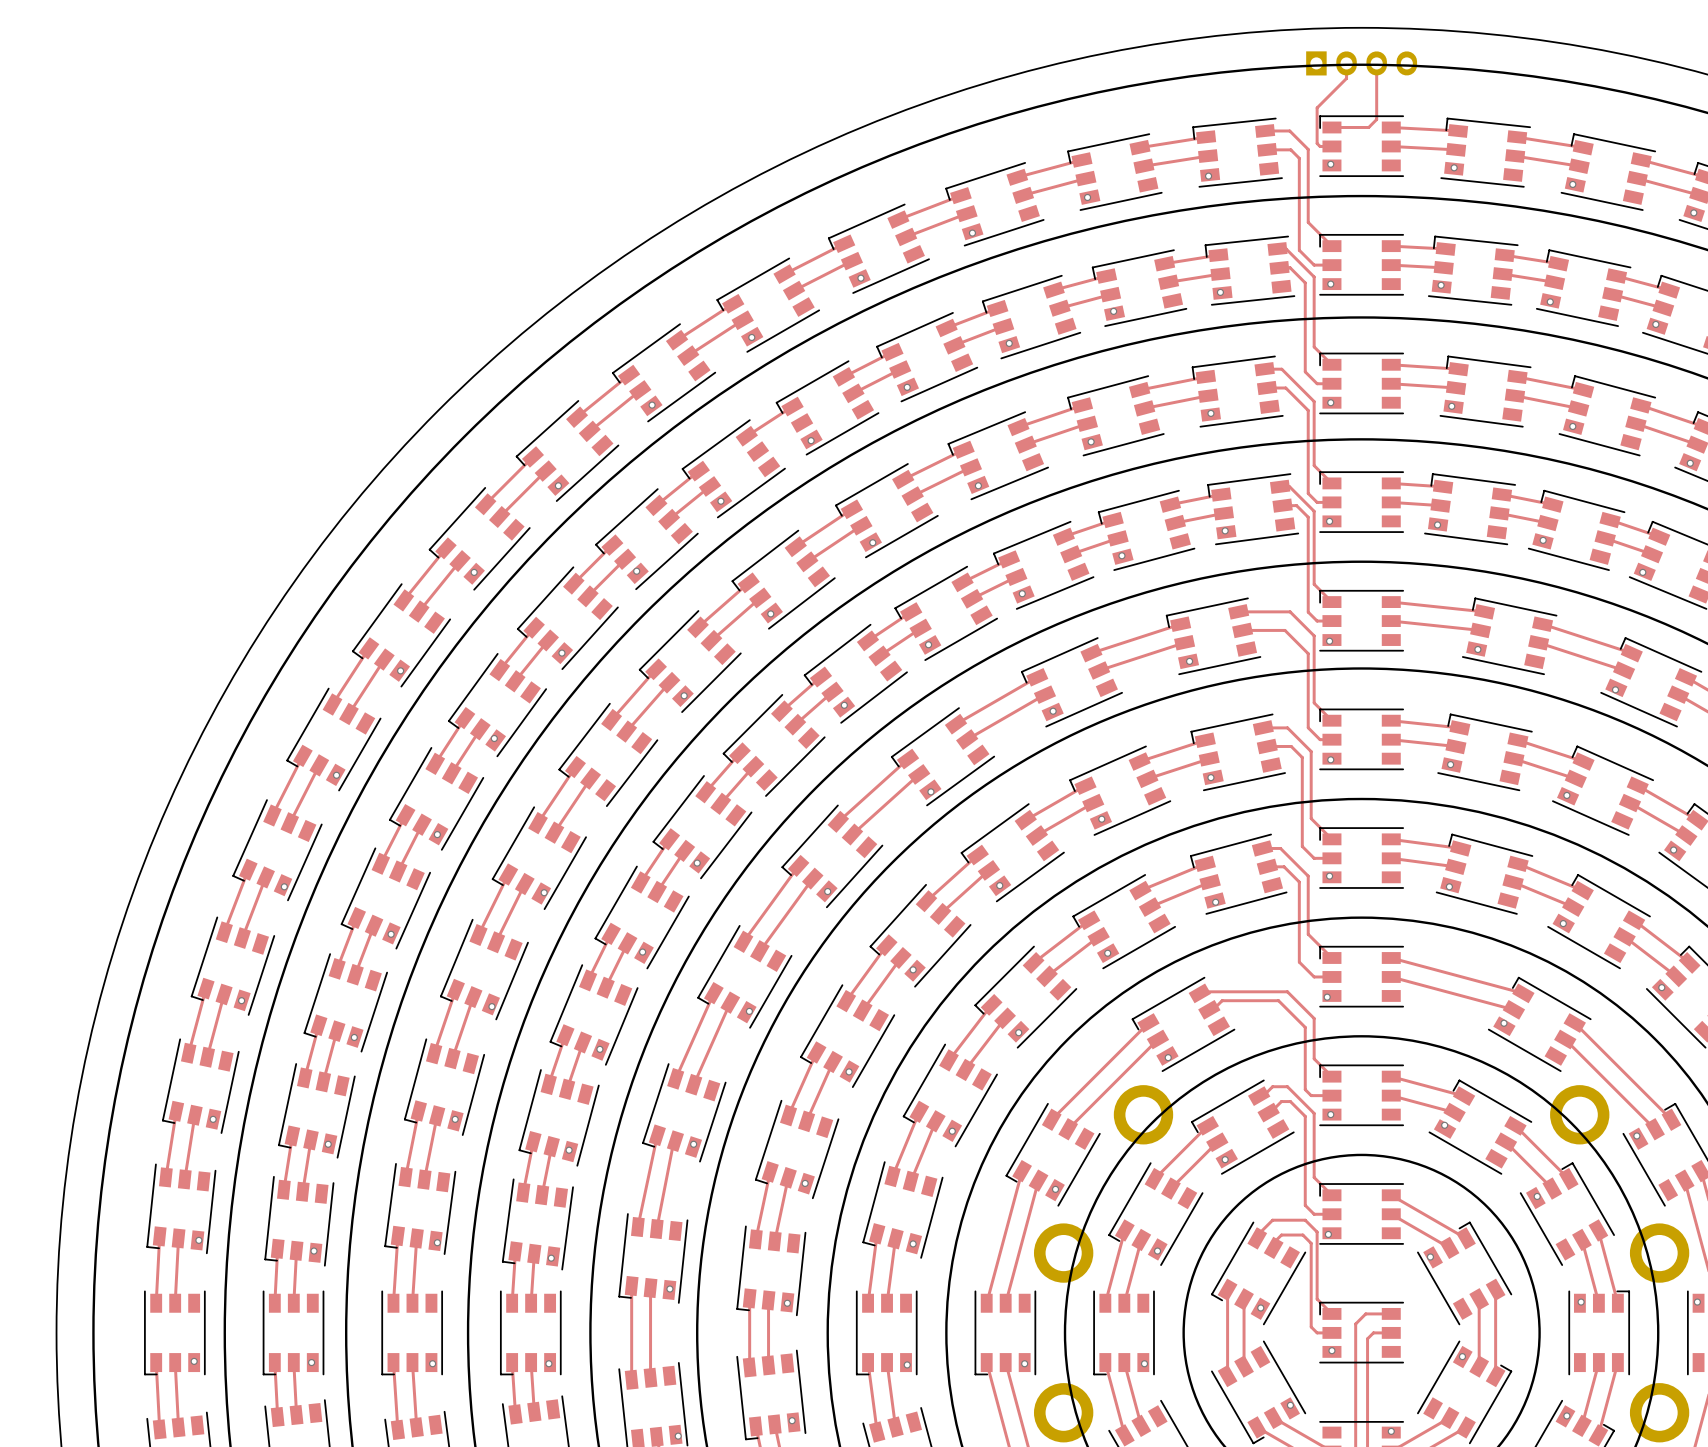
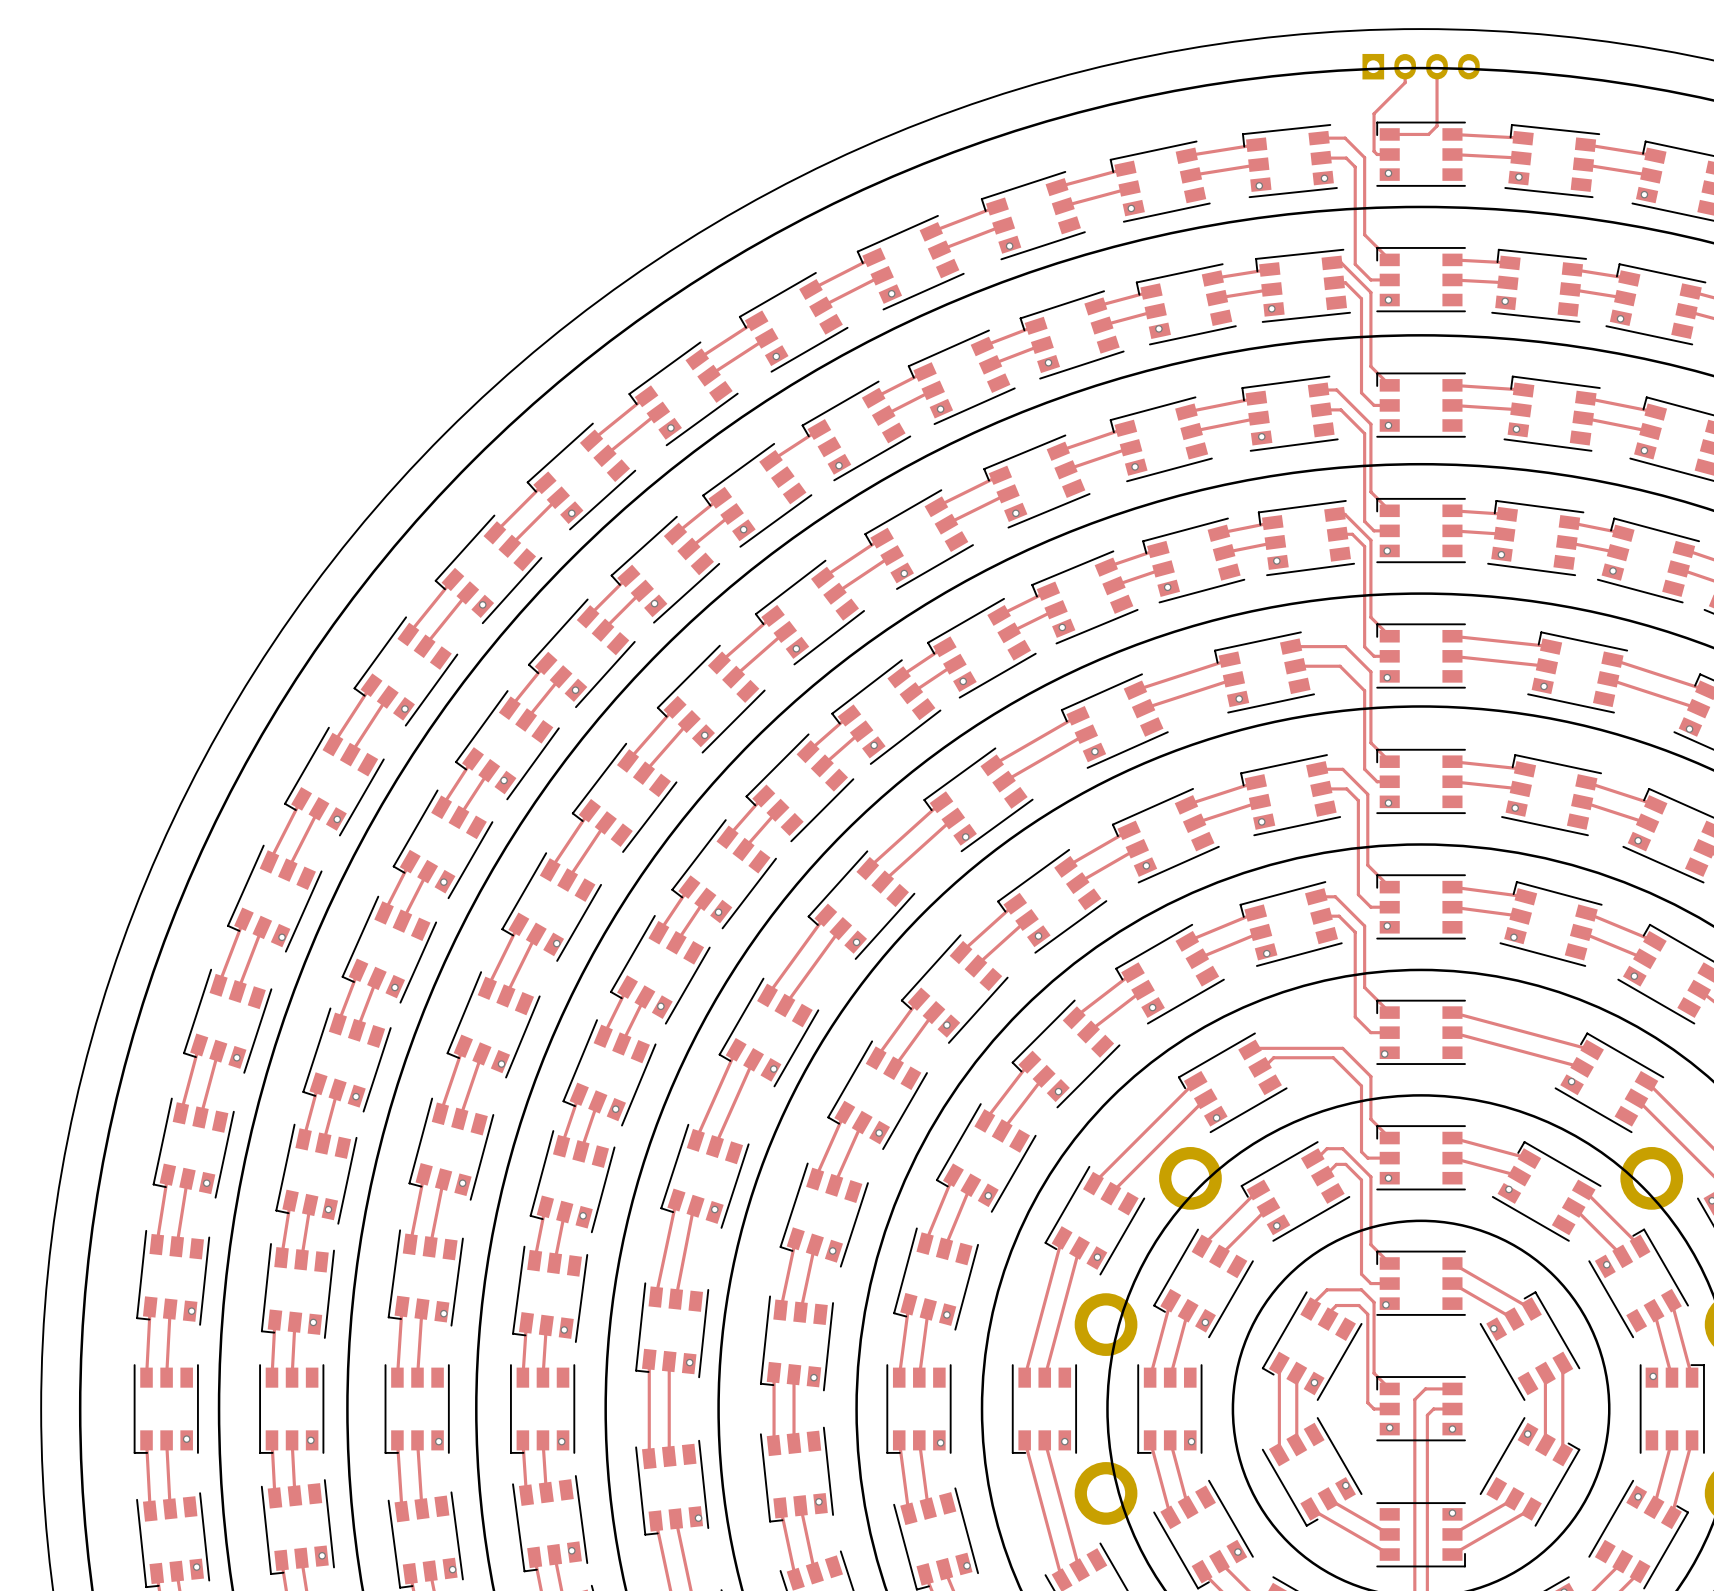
via: none -> (1324, 178)
via: none -> (1452, 1429)

